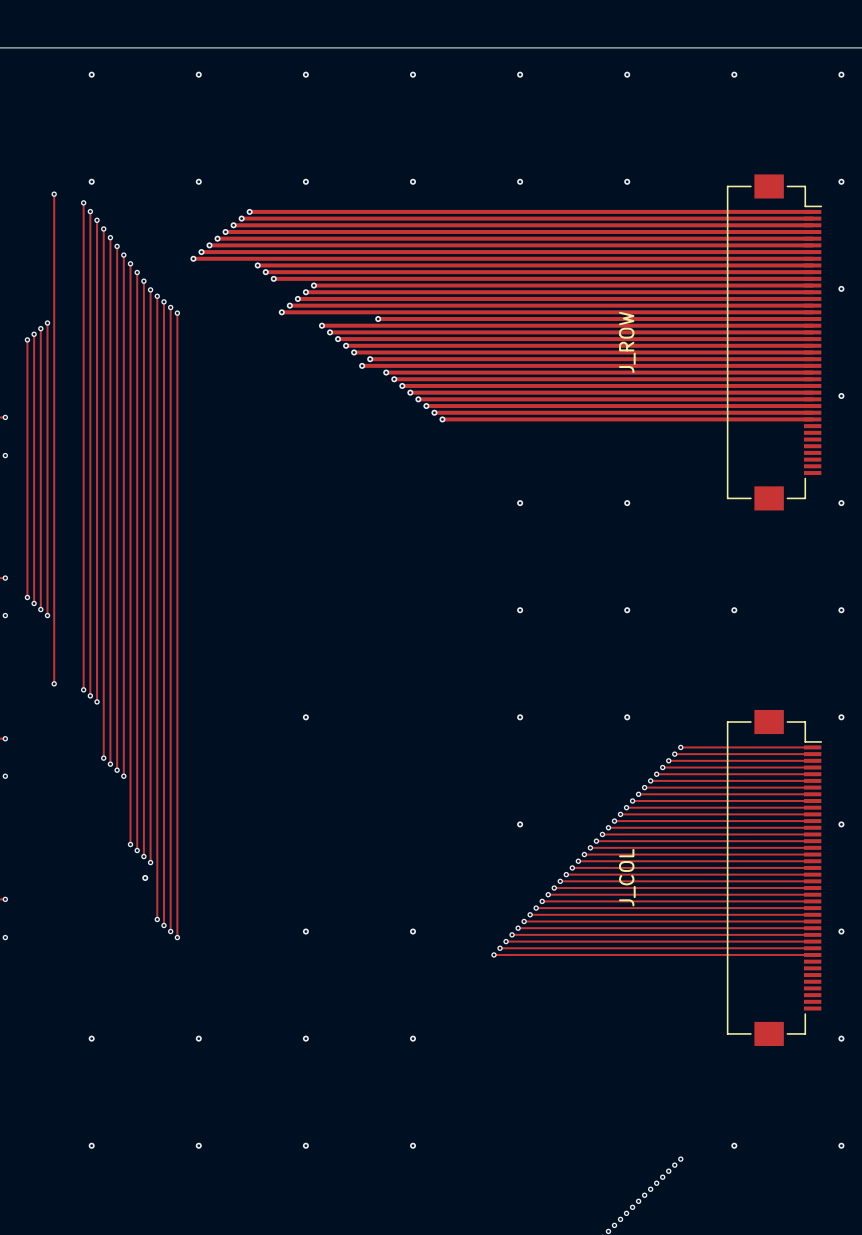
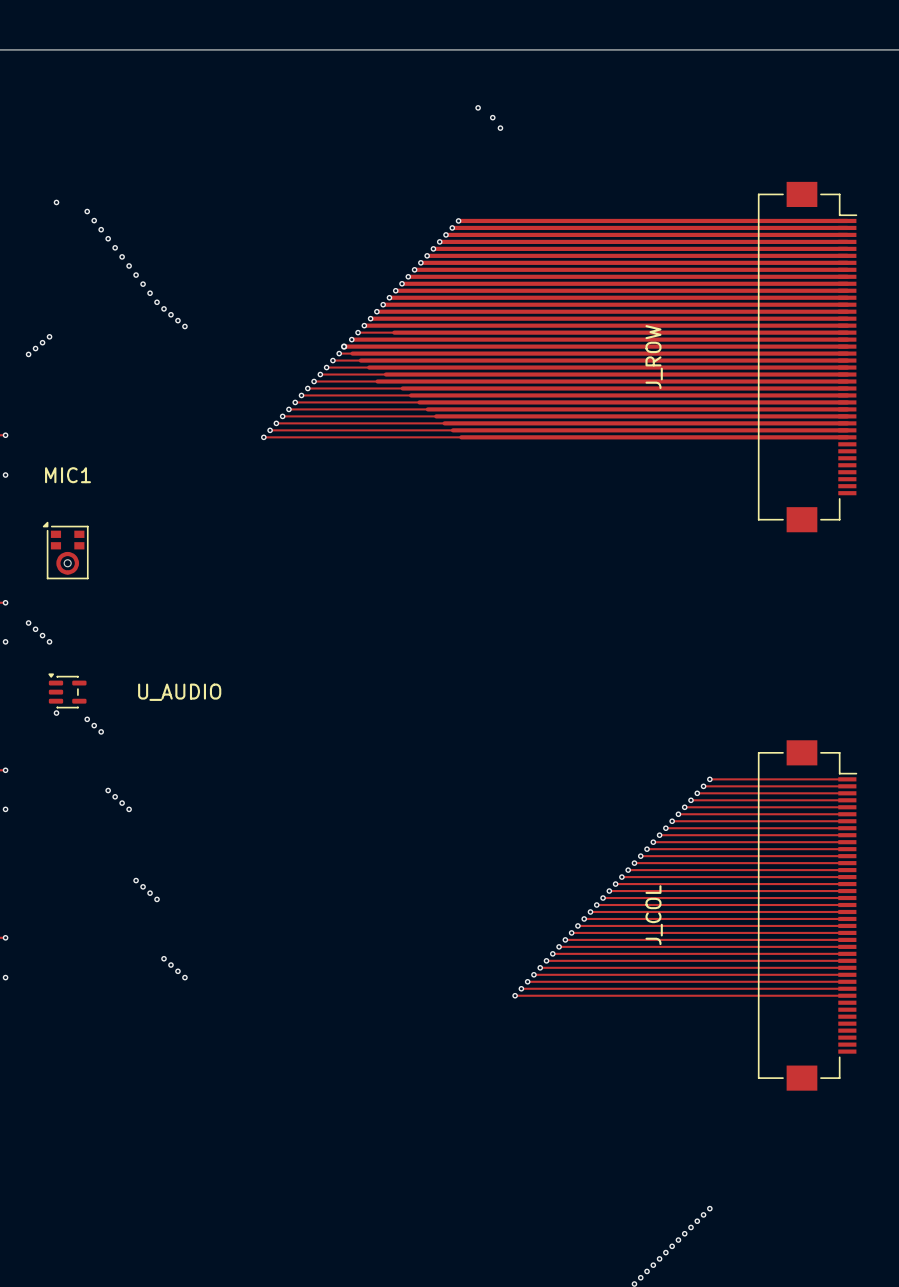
via: (91, 74) -> none
via: (198, 74) -> none
via: (305, 74) -> none
via: (413, 74) -> none
via: (520, 74) -> none
via: (627, 74) -> none
via: (734, 74) -> none
via: (841, 74) -> none
via: none -> (478, 107)
via: none -> (492, 117)
via: none -> (500, 128)
via: (91, 181) -> none
via: (198, 181) -> none
via: (305, 181) -> none
via: (413, 181) -> none
via: (520, 181) -> none
via: (627, 181) -> none
via: (841, 181) -> none
track: (54, 194) (54, 683) -> none
track: (83, 202) (83, 689) -> none
track: (90, 211) (90, 695) -> none
track: (249, 211) (439, 211) -> none
via: (249, 211) -> none
via: none -> (458, 220)
track: (241, 218) (433, 218) -> none
via: (241, 218) -> none
via: none -> (452, 227)
track: (97, 220) (97, 701) -> none
track: (233, 225) (427, 225) -> none
via: (233, 225) -> none
via: none -> (446, 234)
track: (103, 228) (103, 758) -> none
track: (225, 231) (421, 231) -> none
via: (225, 231) -> none
via: none -> (439, 241)
track: (110, 237) (110, 764) -> none
track: (217, 238) (415, 238) -> none
via: (217, 238) -> none
via: none -> (433, 248)
track: (209, 245) (409, 245) -> none
via: (209, 245) -> none
via: none -> (427, 255)
track: (117, 246) (117, 770) -> none
track: (201, 252) (403, 252) -> none
via: (201, 252) -> none
via: none -> (420, 262)
track: (123, 255) (123, 776) -> none
track: (193, 258) (397, 258) -> none
via: (193, 258) -> none
via: none -> (414, 269)
track: (130, 263) (130, 844) -> none
track: (257, 265) (391, 265) -> none
via: (257, 265) -> none
via: none -> (408, 276)
track: (137, 272) (137, 850) -> none
track: (265, 272) (385, 272) -> none
via: (265, 272) -> none
via: none -> (402, 283)
track: (273, 278) (379, 278) -> none
via: (273, 278) -> none
via: none -> (395, 290)
track: (143, 281) (143, 856) -> none
track: (313, 285) (373, 285) -> none
via: (313, 285) -> none
via: none -> (389, 297)
via: (841, 288) -> none
track: (150, 289) (150, 862) -> none
track: (305, 292) (367, 292) -> none
via: (305, 292) -> none
via: none -> (383, 304)
track: (157, 296) (157, 919) -> none
track: (297, 298) (361, 298) -> none
via: (297, 298) -> none
via: none -> (376, 311)
track: (163, 301) (163, 925) -> none
track: (289, 305) (355, 305) -> none
via: (289, 305) -> none
via: none -> (370, 318)
track: (170, 307) (170, 931) -> none
track: (281, 312) (349, 312) -> none
via: (281, 312) -> none
via: none -> (364, 325)
track: (177, 313) (177, 937) -> none
track: none -> (358, 332) (394, 332)
via: none -> (358, 332)
via: (378, 319) -> none
track: (47, 323) (47, 615) -> none
track: (321, 325) (337, 325) -> none
via: (321, 325) -> none
via: none -> (351, 339)
track: (40, 328) (40, 609) -> none
track: (34, 334) (34, 603) -> none
track: (27, 339) (27, 597) -> none
track: none -> (339, 353) (352, 353)
via: none -> (339, 353)
via: (338, 339) -> none
track: none -> (332, 360) (360, 360)
via: none -> (332, 360)
via: (346, 345) -> none
track: none -> (326, 367) (369, 367)
via: none -> (326, 367)
via: (354, 352) -> none
track: none -> (320, 374) (385, 374)
via: none -> (320, 374)
via: (370, 359) -> none
track: none -> (314, 381) (377, 381)
via: none -> (314, 381)
via: (362, 365) -> none
track: none -> (307, 388) (402, 388)
via: none -> (307, 388)
via: (386, 372) -> none
track: none -> (301, 395) (411, 395)
via: none -> (301, 395)
via: (394, 379) -> none
track: none -> (295, 402) (419, 402)
via: none -> (295, 402)
via: (402, 385) -> none
track: none -> (288, 409) (427, 409)
via: none -> (288, 409)
via: (410, 392) -> none
via: (841, 396) -> none
track: none -> (282, 416) (436, 416)
via: none -> (282, 416)
via: (418, 399) -> none
track: none -> (276, 423) (444, 423)
via: none -> (276, 423)
via: (426, 406) -> none
track: none -> (270, 430) (452, 430)
via: none -> (270, 430)
via: (434, 412) -> none
track: none -> (263, 437) (461, 437)
via: none -> (263, 437)
via: (442, 419) -> none
via: (520, 503) -> none
via: (627, 503) -> none
via: (841, 503) -> none
MIC1: none -> (65, 550)
via: (520, 610) -> none
via: (627, 610) -> none
via: (734, 610) -> none
via: (841, 610) -> none
U_AUDIO: none -> (67, 690)
via: (305, 717) -> none
via: (520, 717) -> none
via: (627, 717) -> none
via: (841, 717) -> none
via: (520, 824) -> none
via: (841, 824) -> none
via: (145, 877) -> none
via: (305, 931) -> none
via: (413, 931) -> none
via: (841, 931) -> none
via: (91, 1038) -> none
via: (198, 1038) -> none
via: (305, 1038) -> none
via: (413, 1038) -> none
via: (841, 1038) -> none
via: (91, 1145) -> none
via: (198, 1145) -> none
via: (305, 1145) -> none
via: (413, 1145) -> none
via: (734, 1145) -> none
via: (841, 1145) -> none

